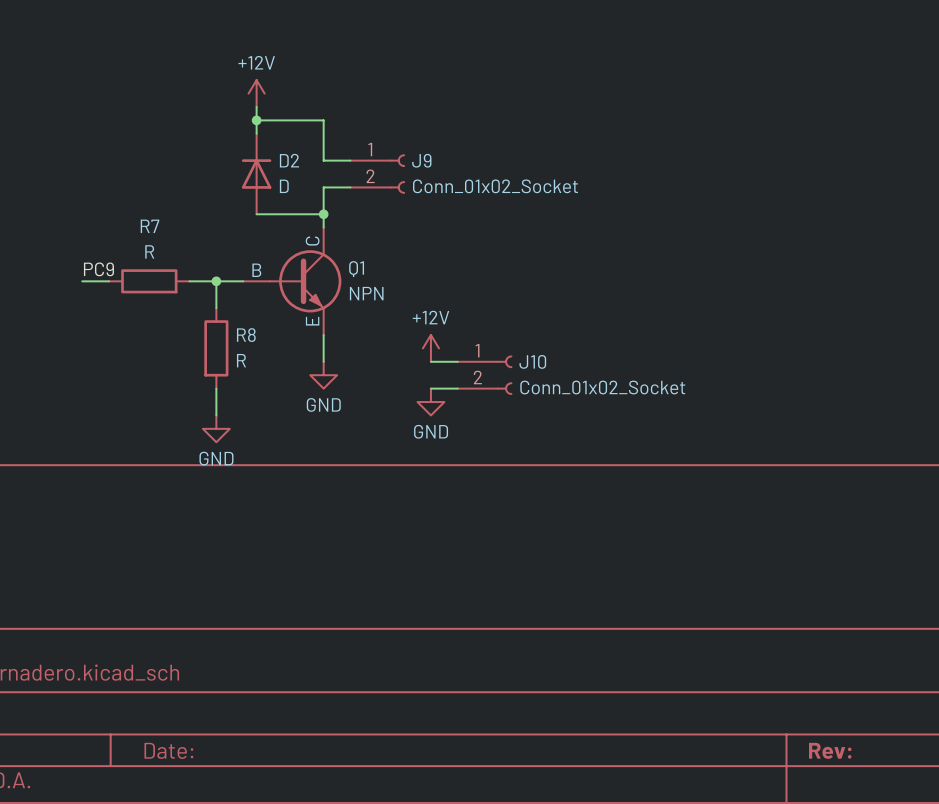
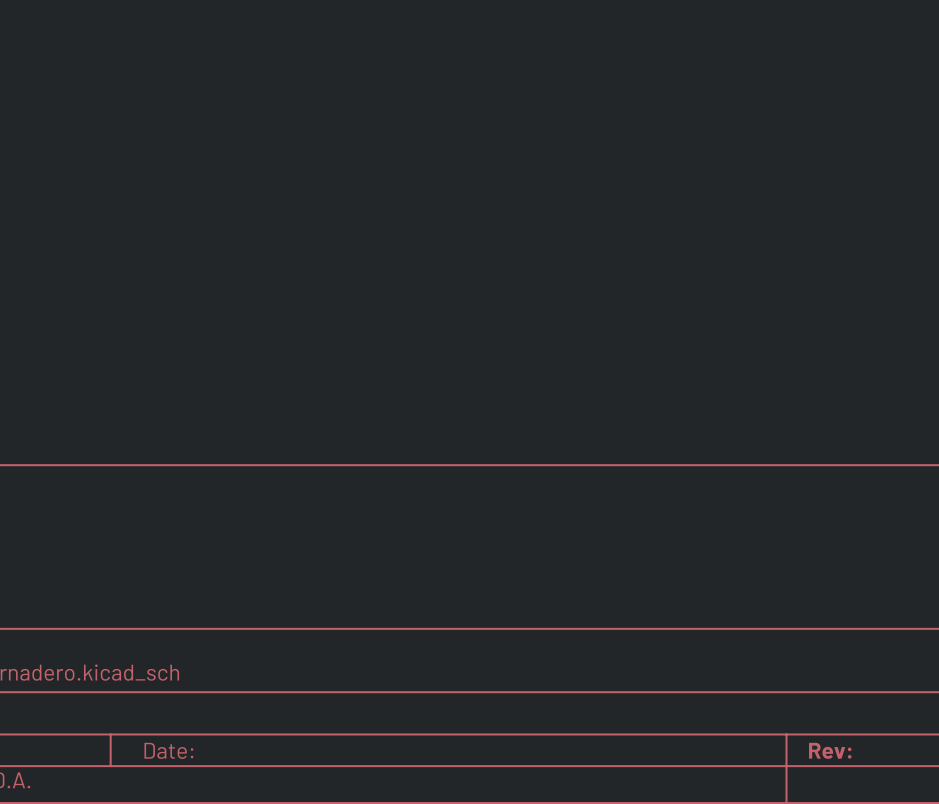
power symbol: +12V (256, 93) -> none
wire: (256, 106) (256, 133) -> none
wire: (256, 120) (323, 120) (323, 160) (350, 160) -> none
junction: (256, 120) -> none
D2: D (256, 174) -> none
J9: Conn_01x02_Socket (377, 174) -> none
wire: (350, 187) (323, 187) (323, 227) -> none
wire: (256, 214) (323, 214) -> none
junction: (323, 214) -> none
label: PC9 (98, 269) -> none
wire: (82, 281) (109, 281) -> none
R7: R (149, 281) -> none
wire: (189, 281) (243, 281) -> none
wire: (216, 281) (216, 308) -> none
junction: (216, 281) -> none
Q1: NPN (292, 281) -> none
wire: (323, 334) (323, 361) -> none
R8: R (216, 348) -> none
power symbol: +12V (430, 348) -> none
wire: (430, 361) (457, 361) -> none
power symbol: GND (323, 375) -> none
J10: Conn_01x02_Socket (485, 375) -> none
wire: (216, 388) (216, 415) -> none
wire: (430, 388) (457, 388) -> none
power symbol: GND (430, 402) -> none
power symbol: GND (216, 428) -> none

